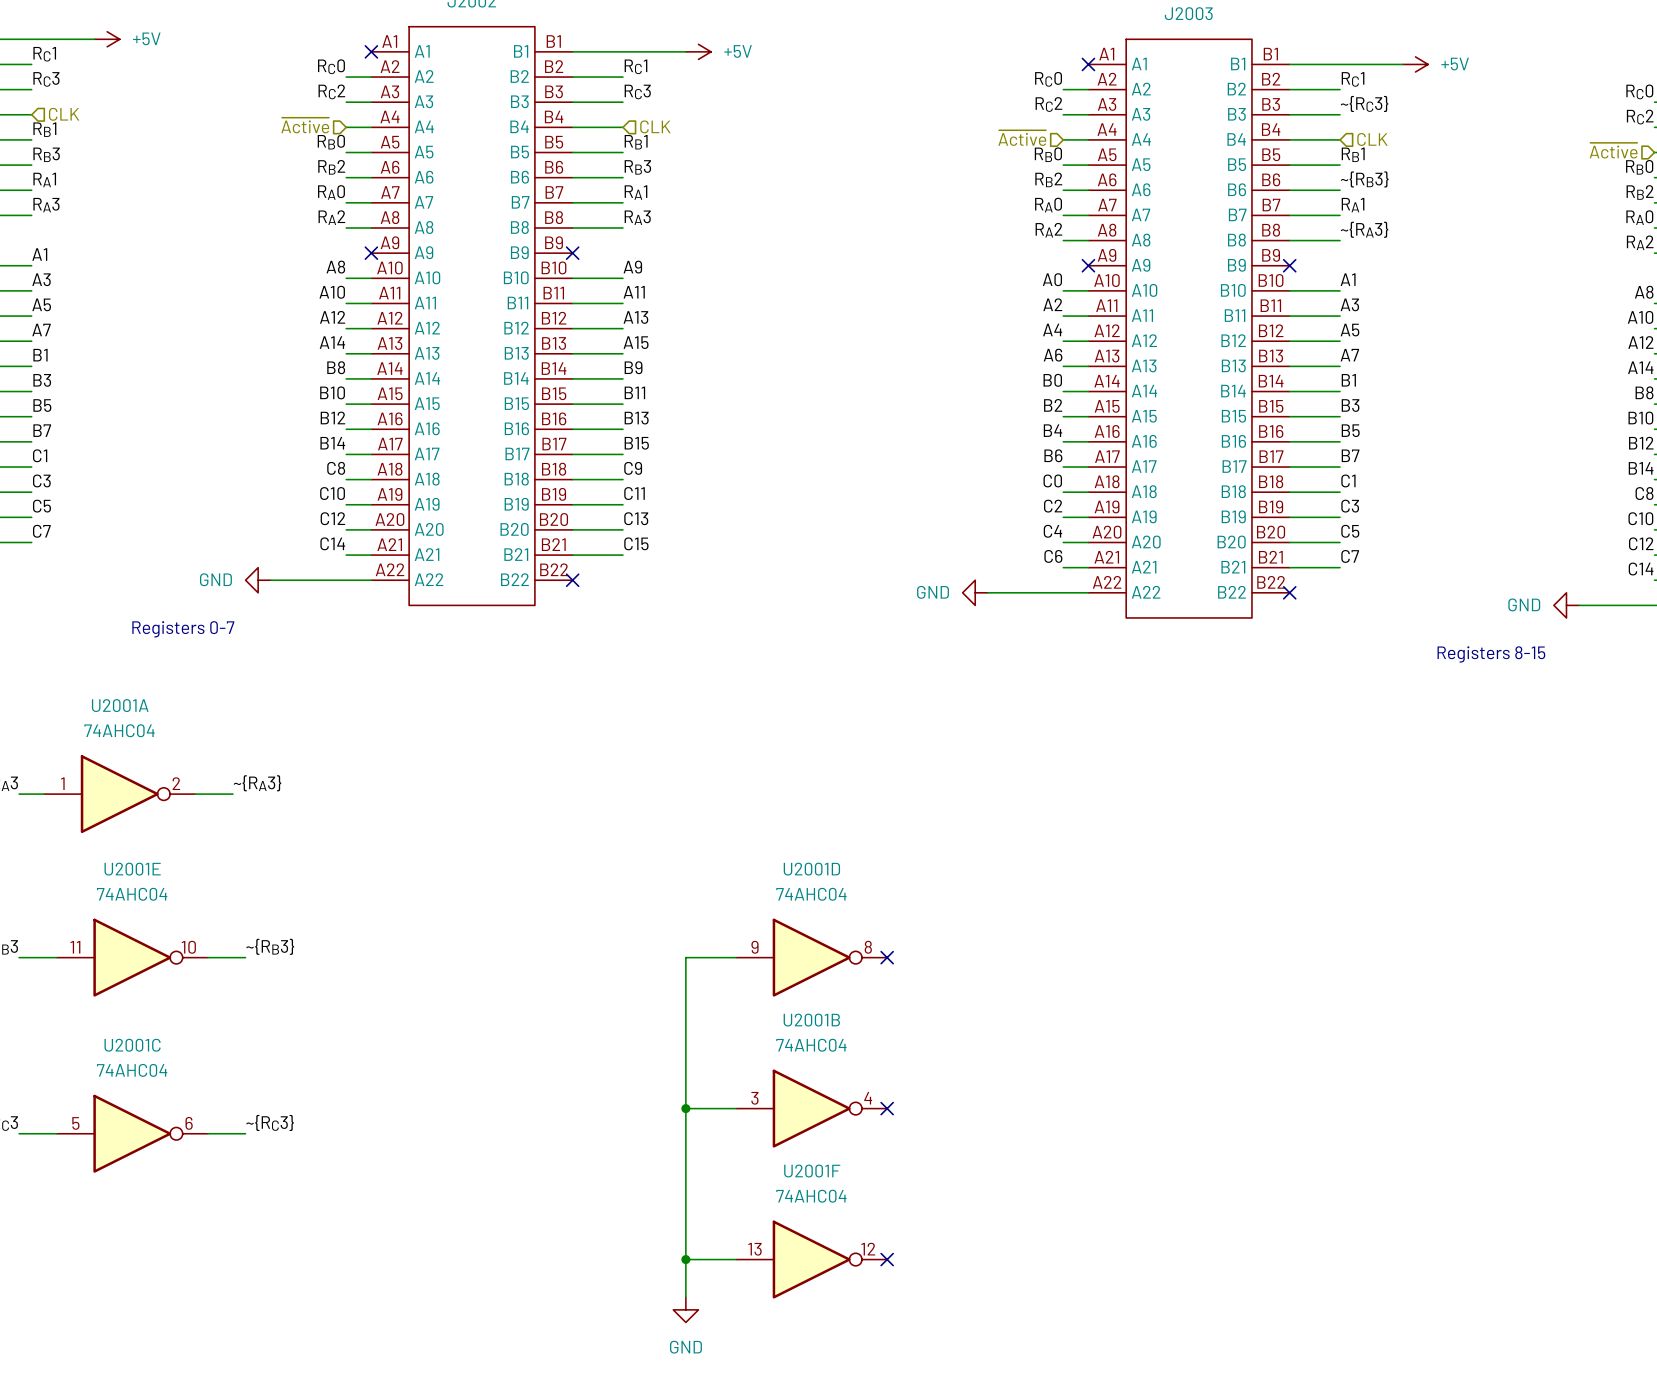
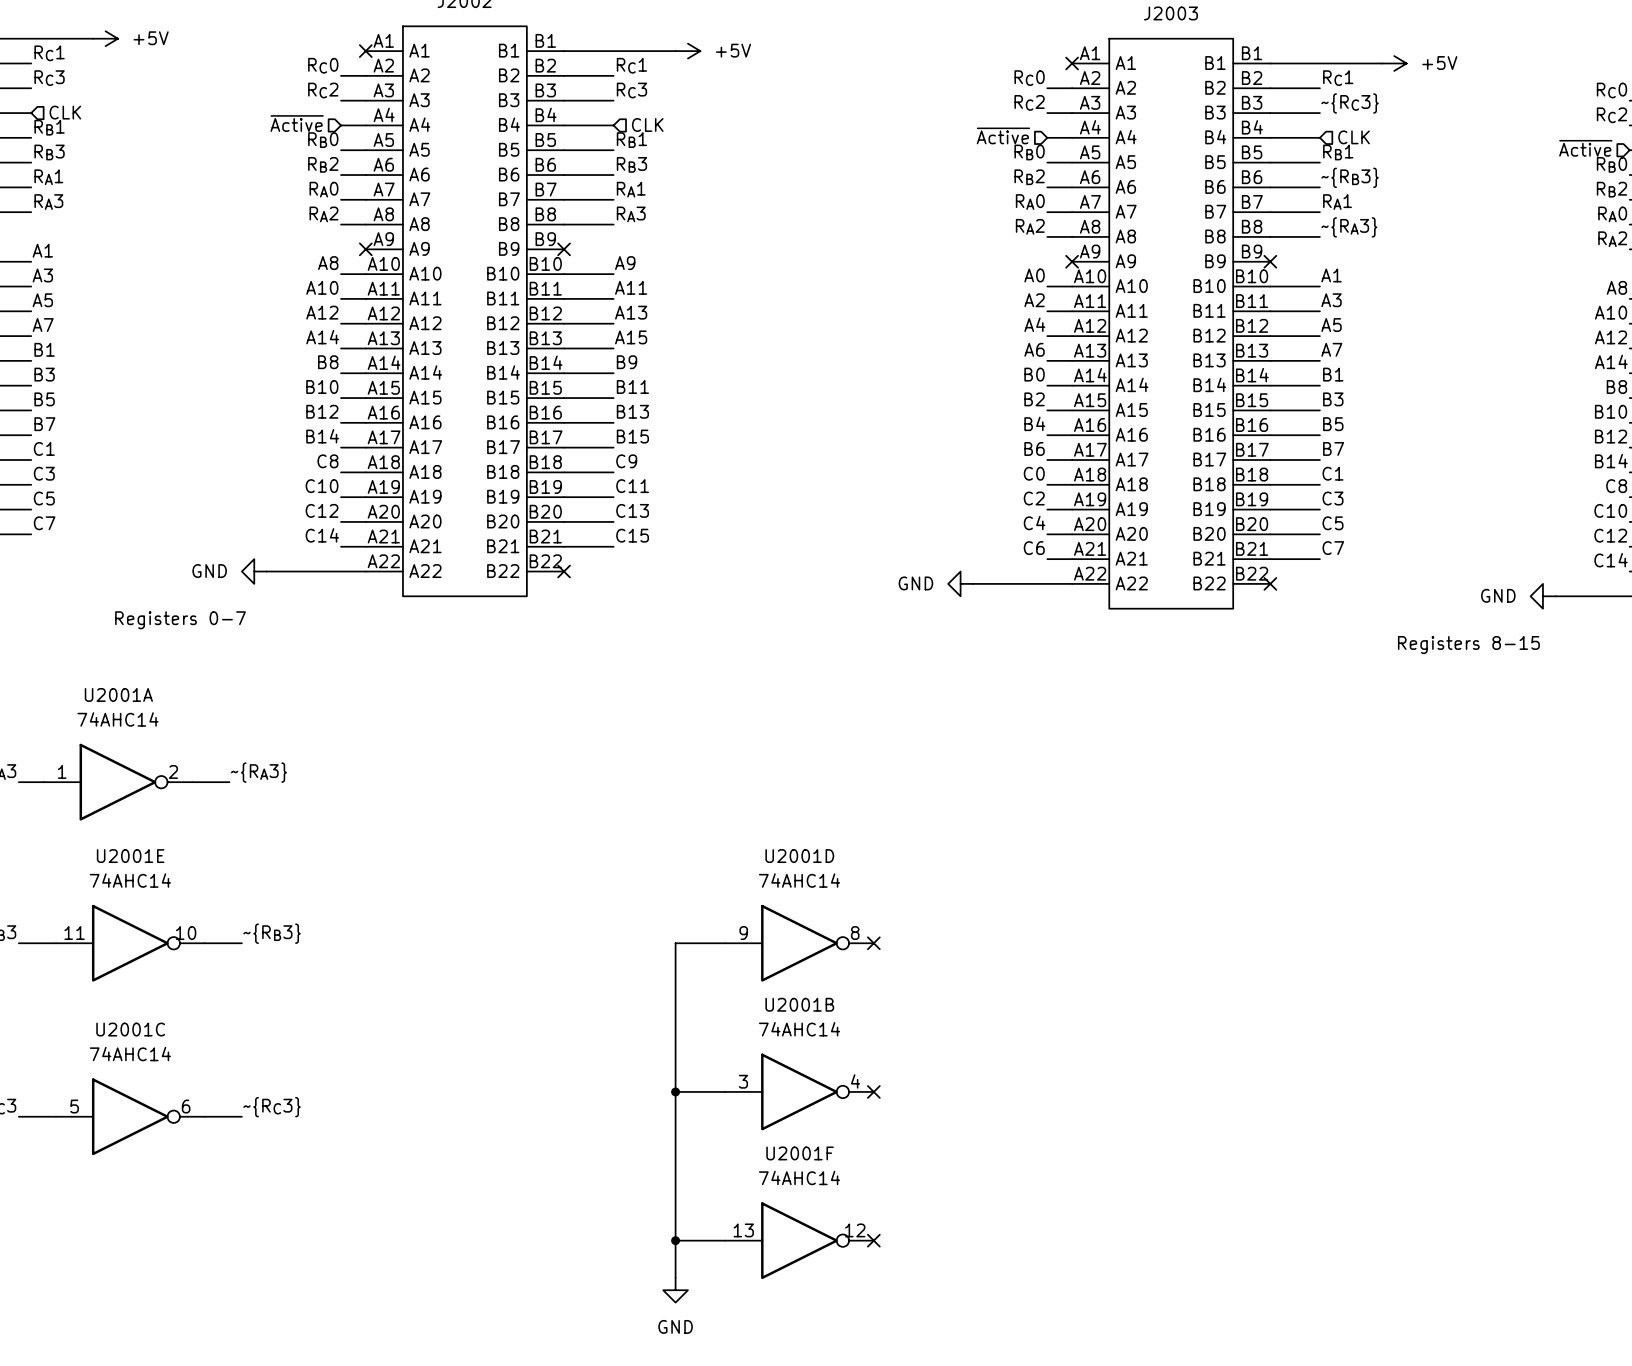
U2001A value: 74AHC04 (119, 730) -> 74AHC14 (117, 719)
U2001E value: 74AHC04 (132, 894) -> 74AHC14 (130, 880)
U2001D value: 74AHC04 (811, 894) -> 74AHC14 (799, 880)
U2001B value: 74AHC04 (811, 1045) -> 74AHC14 (799, 1029)
U2001C value: 74AHC04 (132, 1070) -> 74AHC14 (130, 1054)
U2001F value: 74AHC04 (811, 1196) -> 74AHC14 (799, 1177)

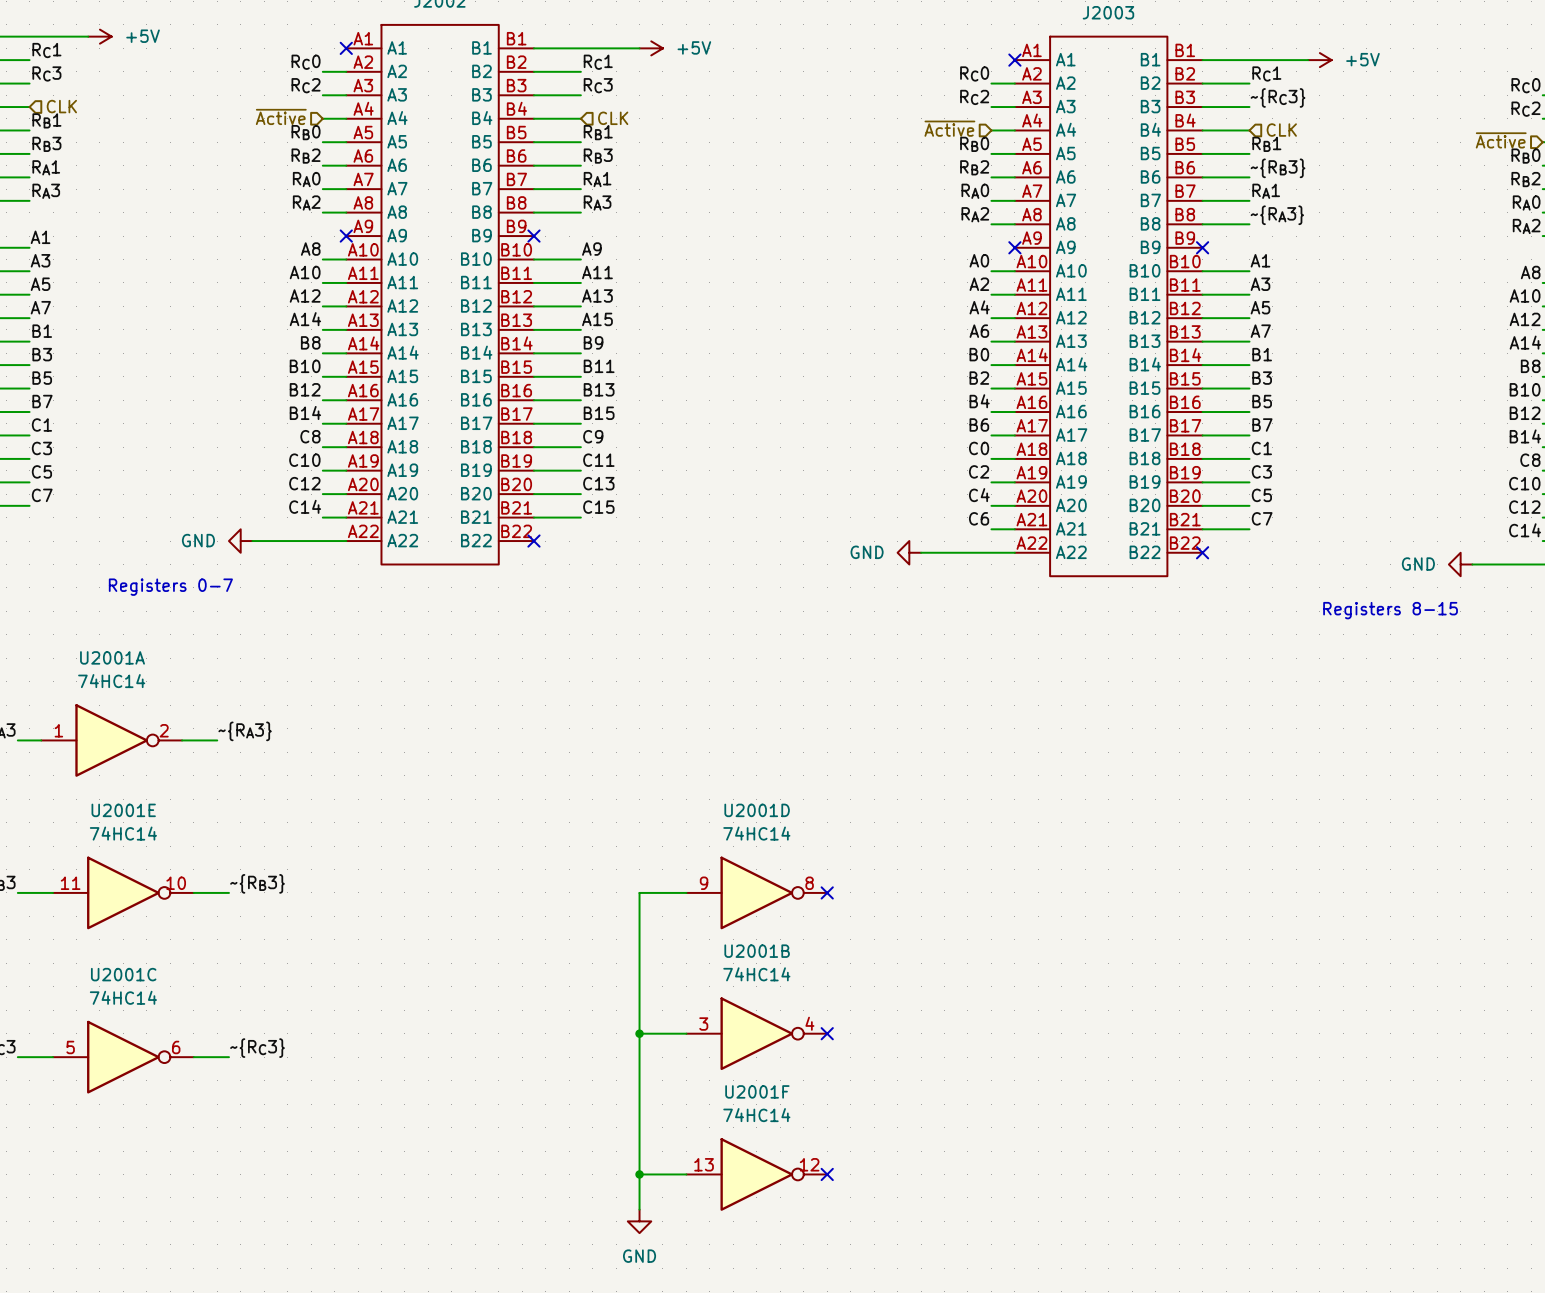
U2001A value: 74AHC14 (117, 719) -> 74HC14 (111, 681)
U2001E value: 74AHC14 (130, 880) -> 74HC14 (123, 833)
U2001D value: 74AHC14 (799, 880) -> 74HC14 (756, 833)
U2001B value: 74AHC14 (799, 1029) -> 74HC14 (756, 974)
U2001C value: 74AHC14 (130, 1054) -> 74HC14 (123, 997)
U2001F value: 74AHC14 (799, 1177) -> 74HC14 (756, 1115)

